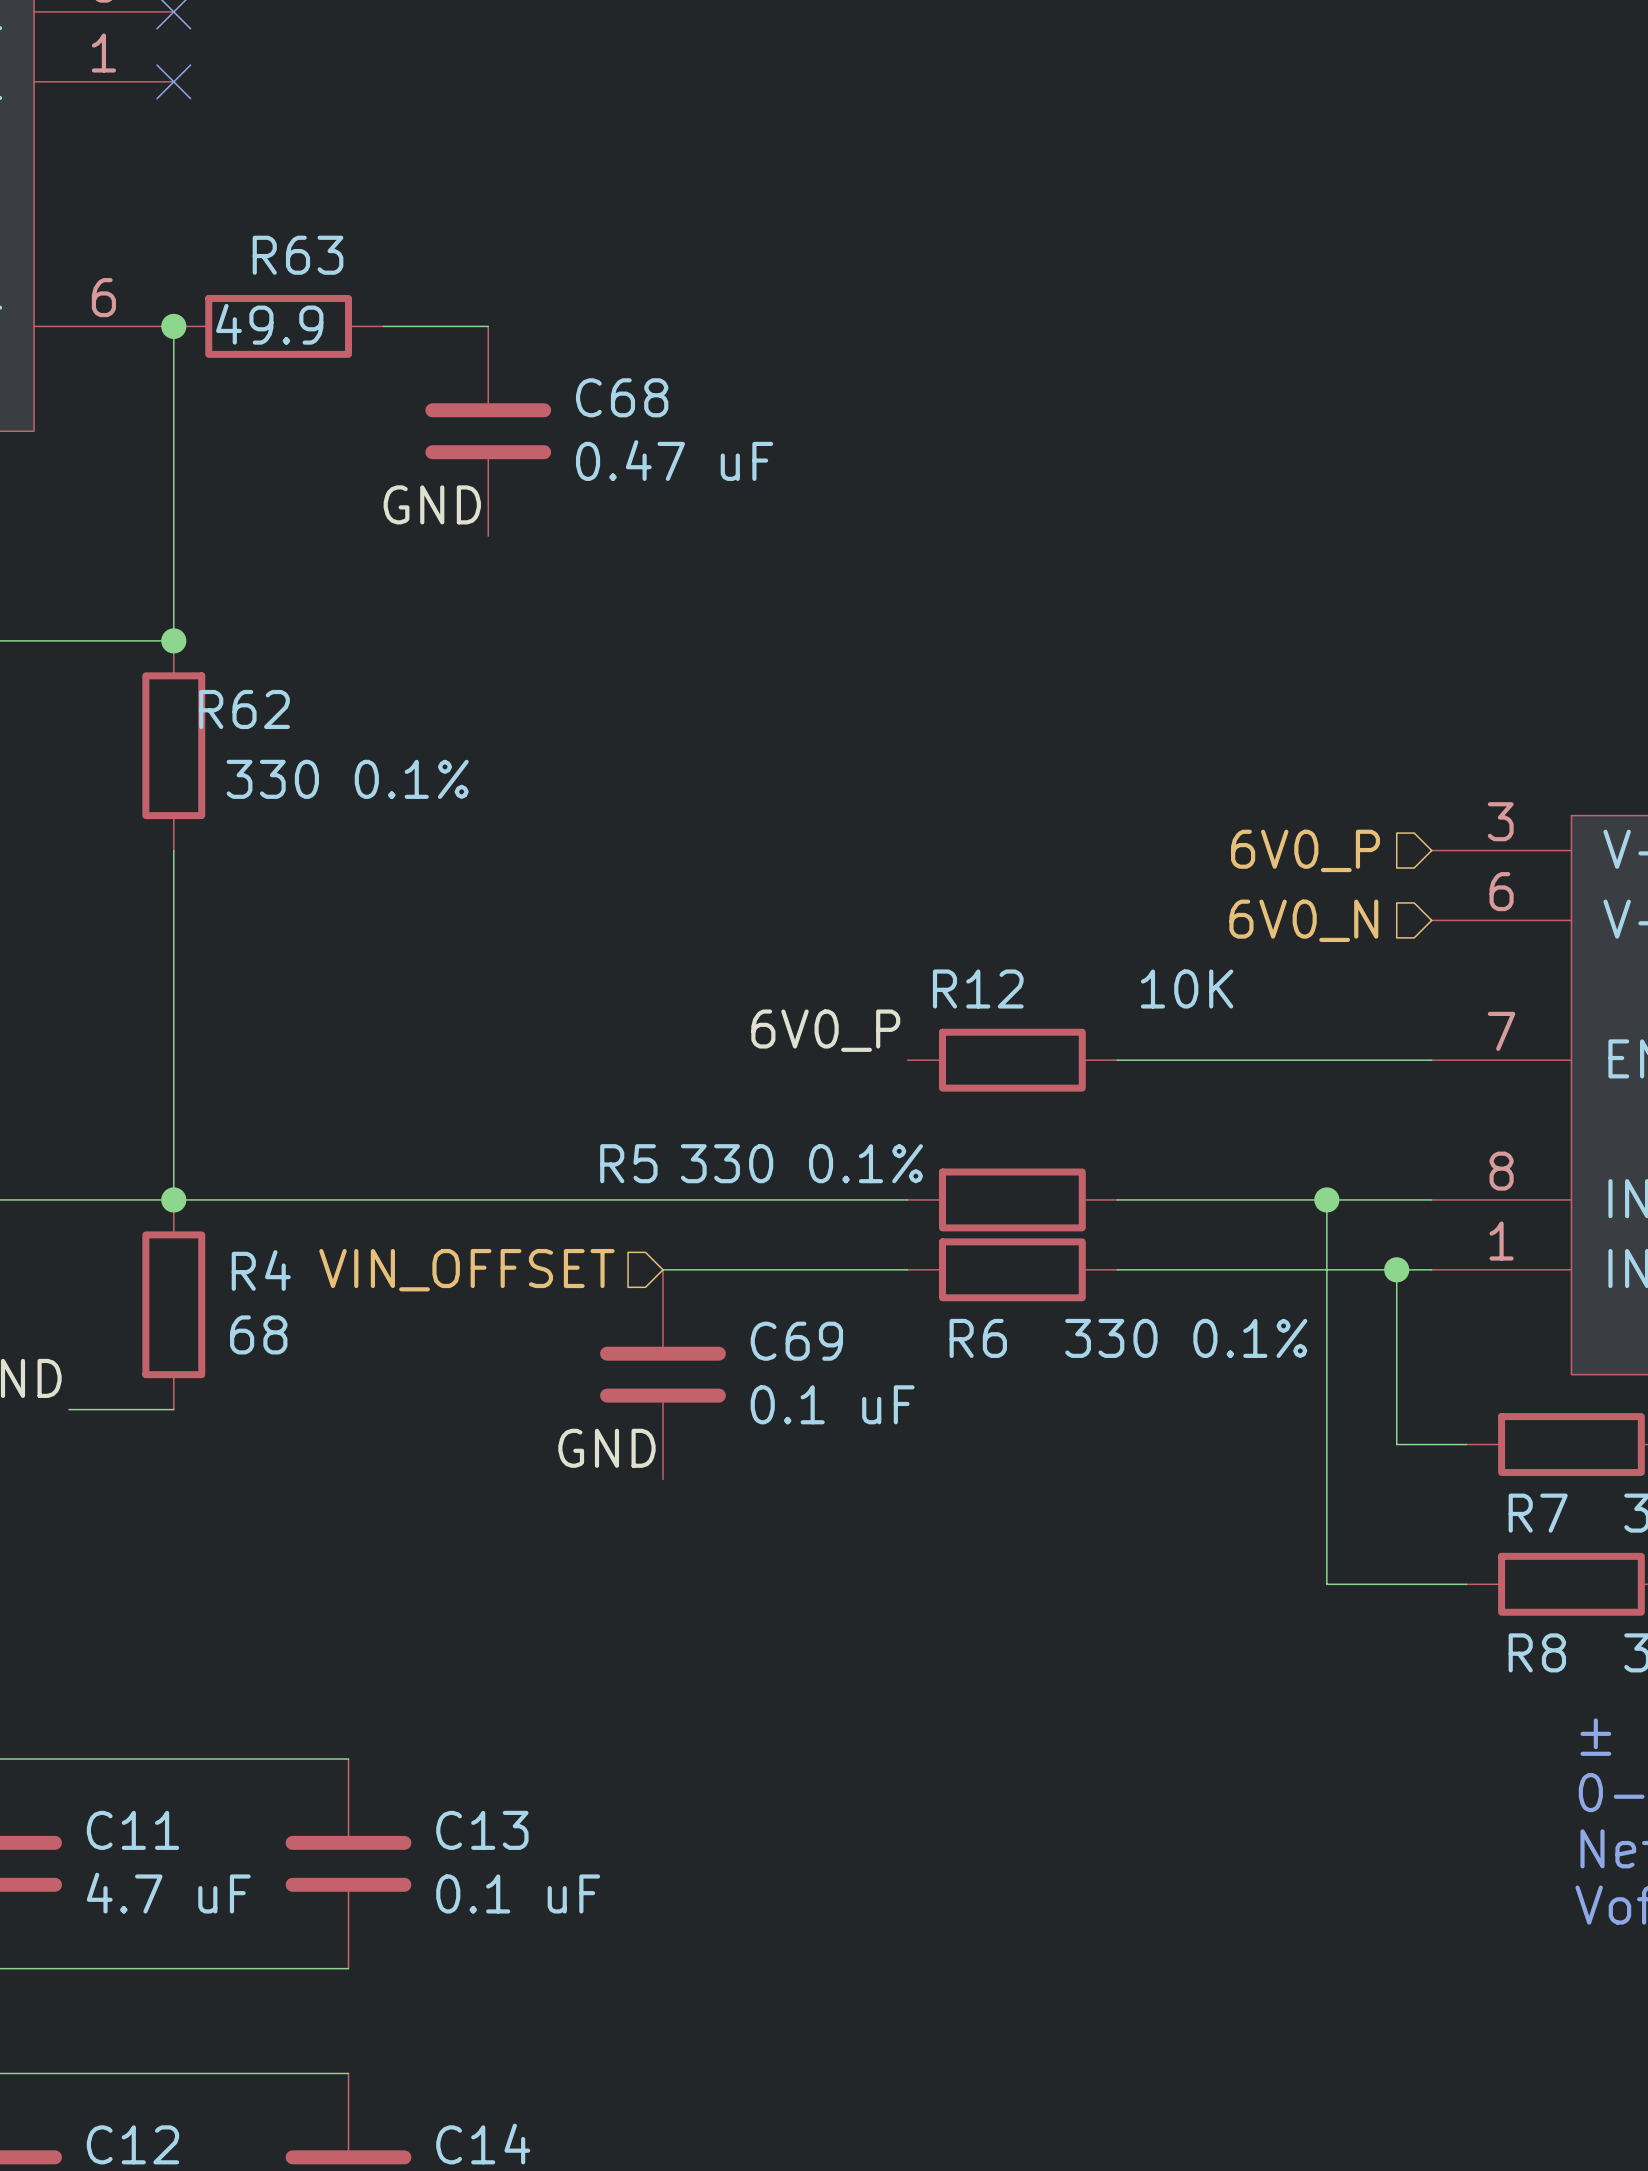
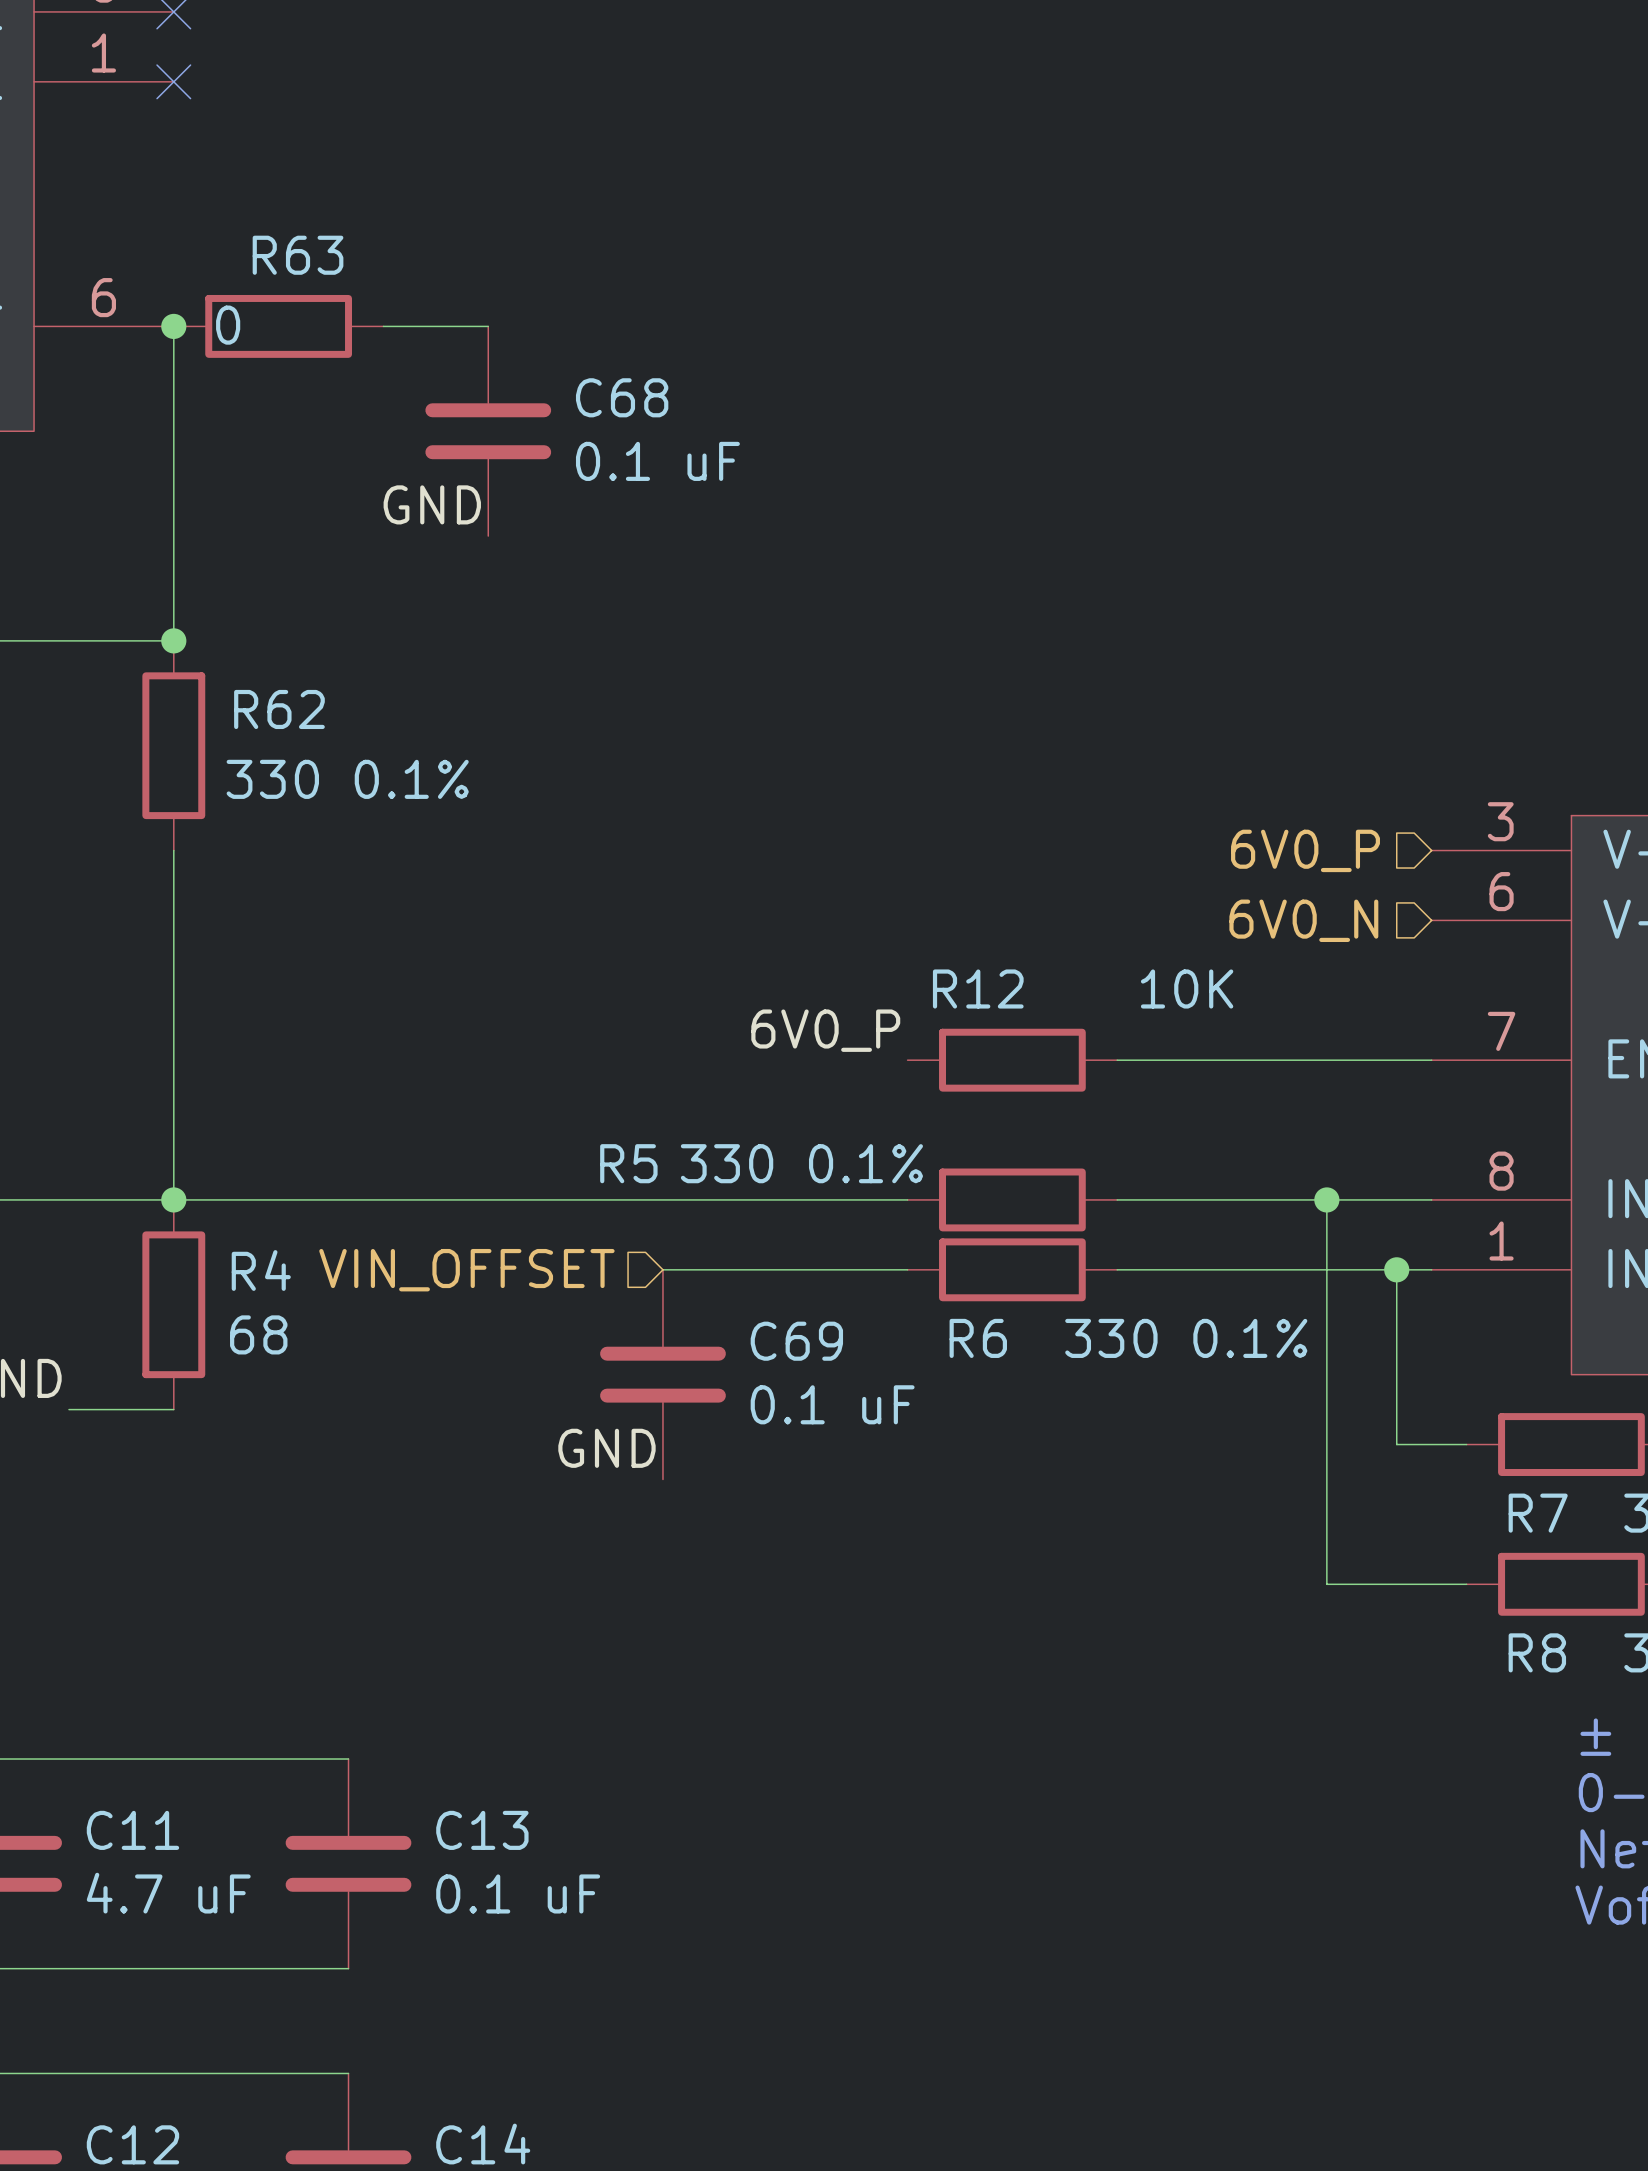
R63 value: 49.9 (269, 324) -> 0 (228, 325)
C68 value: 0.47 uF (674, 460) -> 0.1 uF (657, 461)
R62 name position: R62 (244, 709) -> R62 (279, 709)

